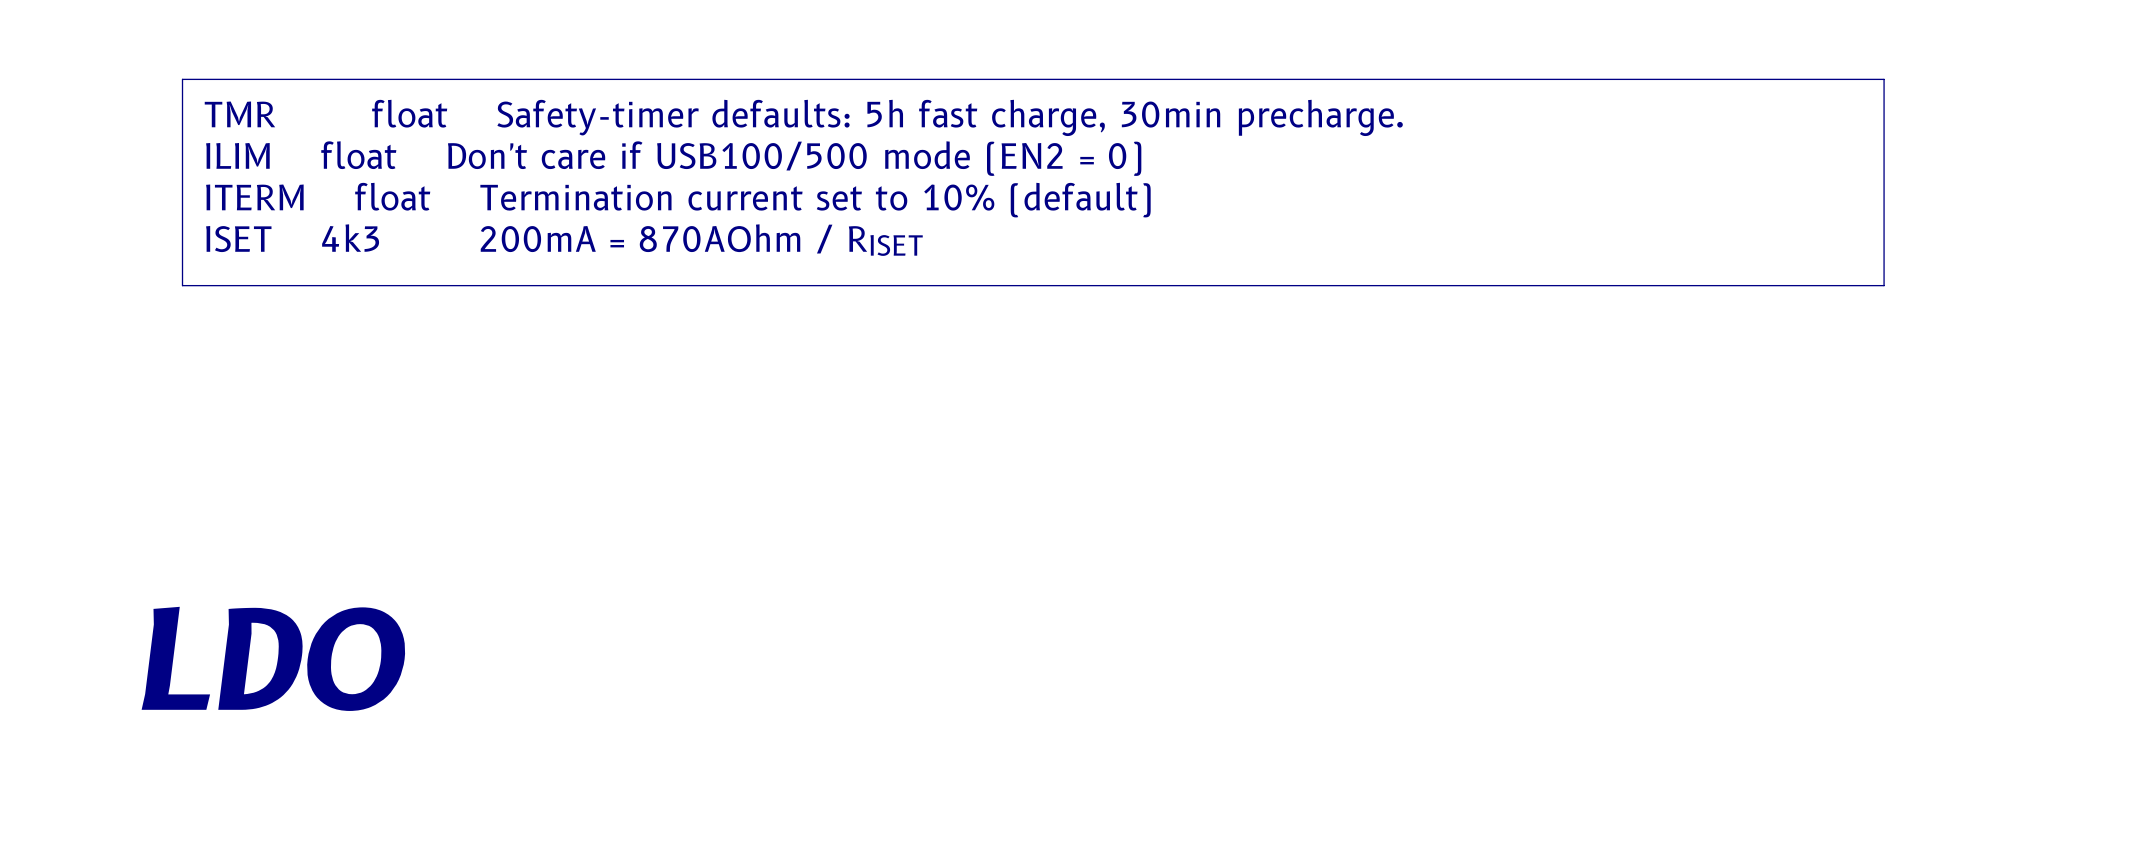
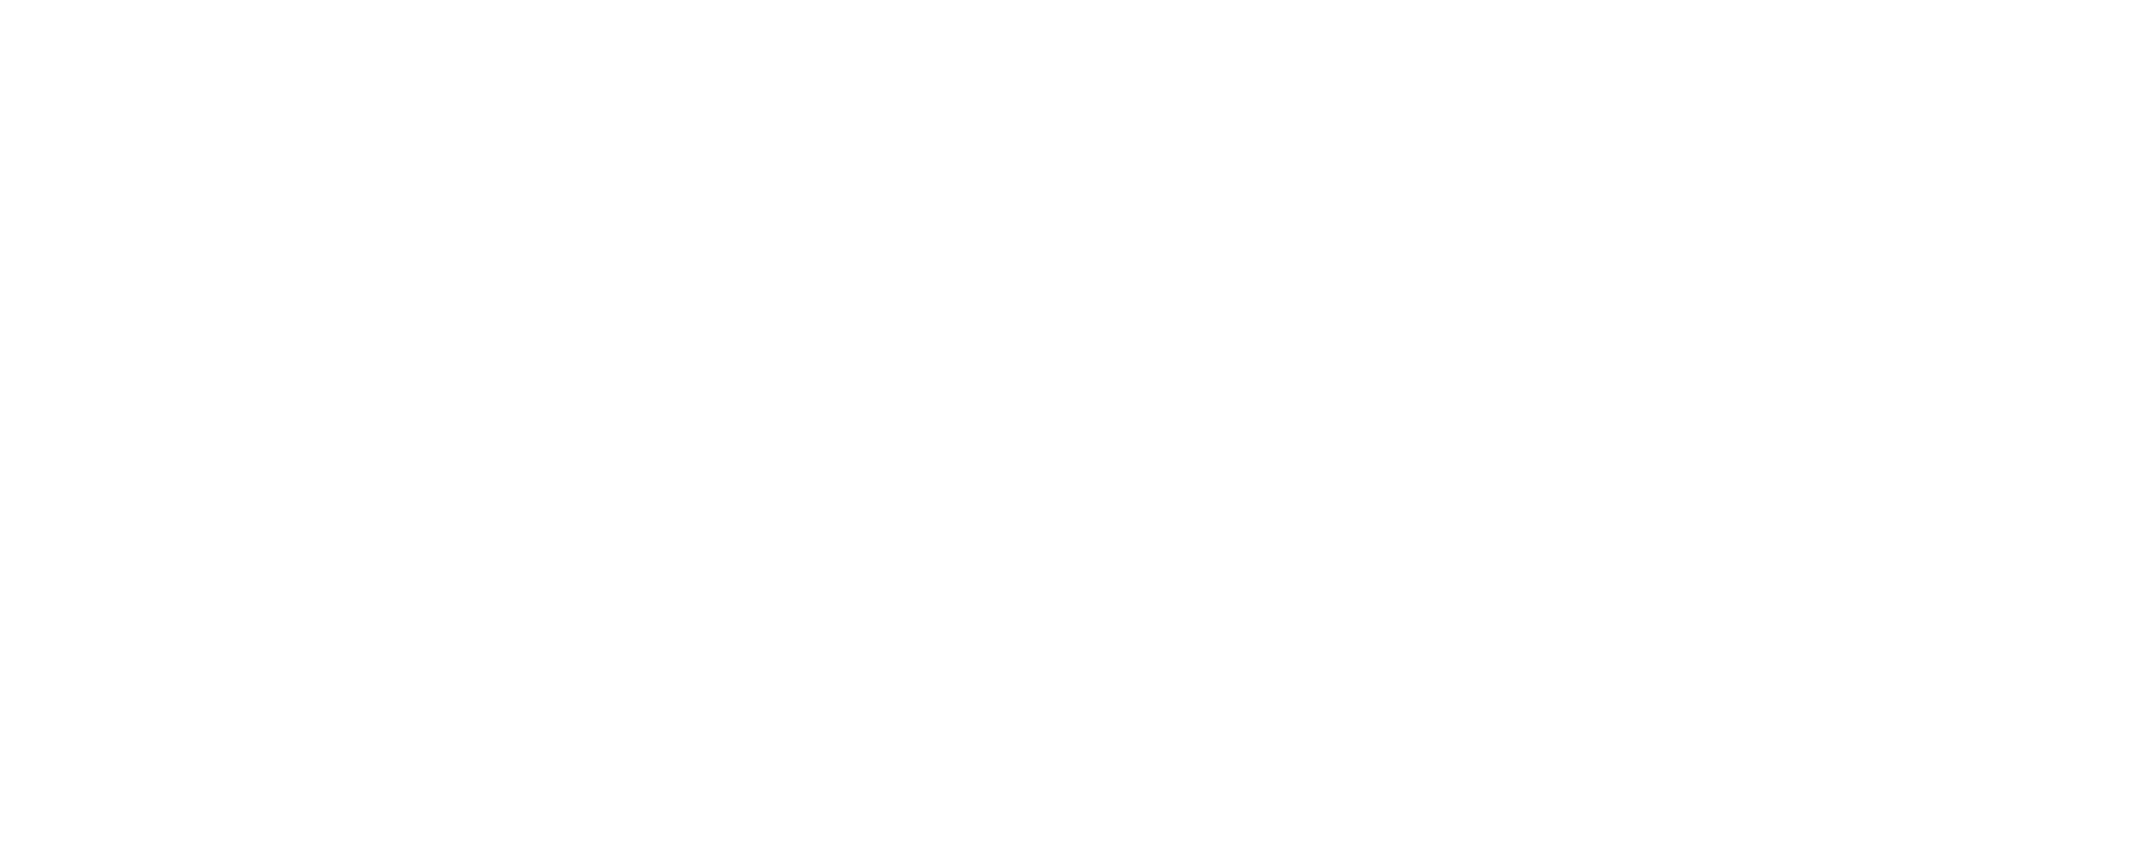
line: (182, 79) (1884, 79) (1884, 285) (182, 285) (182, 79) -> none
text: TMR float Safety-timer defaults: 5h fast charge, 30min precharge. (803, 117) -> none
text: ILIM float Don't care if USB100/500 mode (EN2 = 0) (673, 158) -> none
text: ITERM float Termination current set to 10% (default) (678, 200) -> none
text: ISET 4k3 200mA = 870AOhm / RISET (564, 240) -> none
text: LDO (273, 658) -> none

